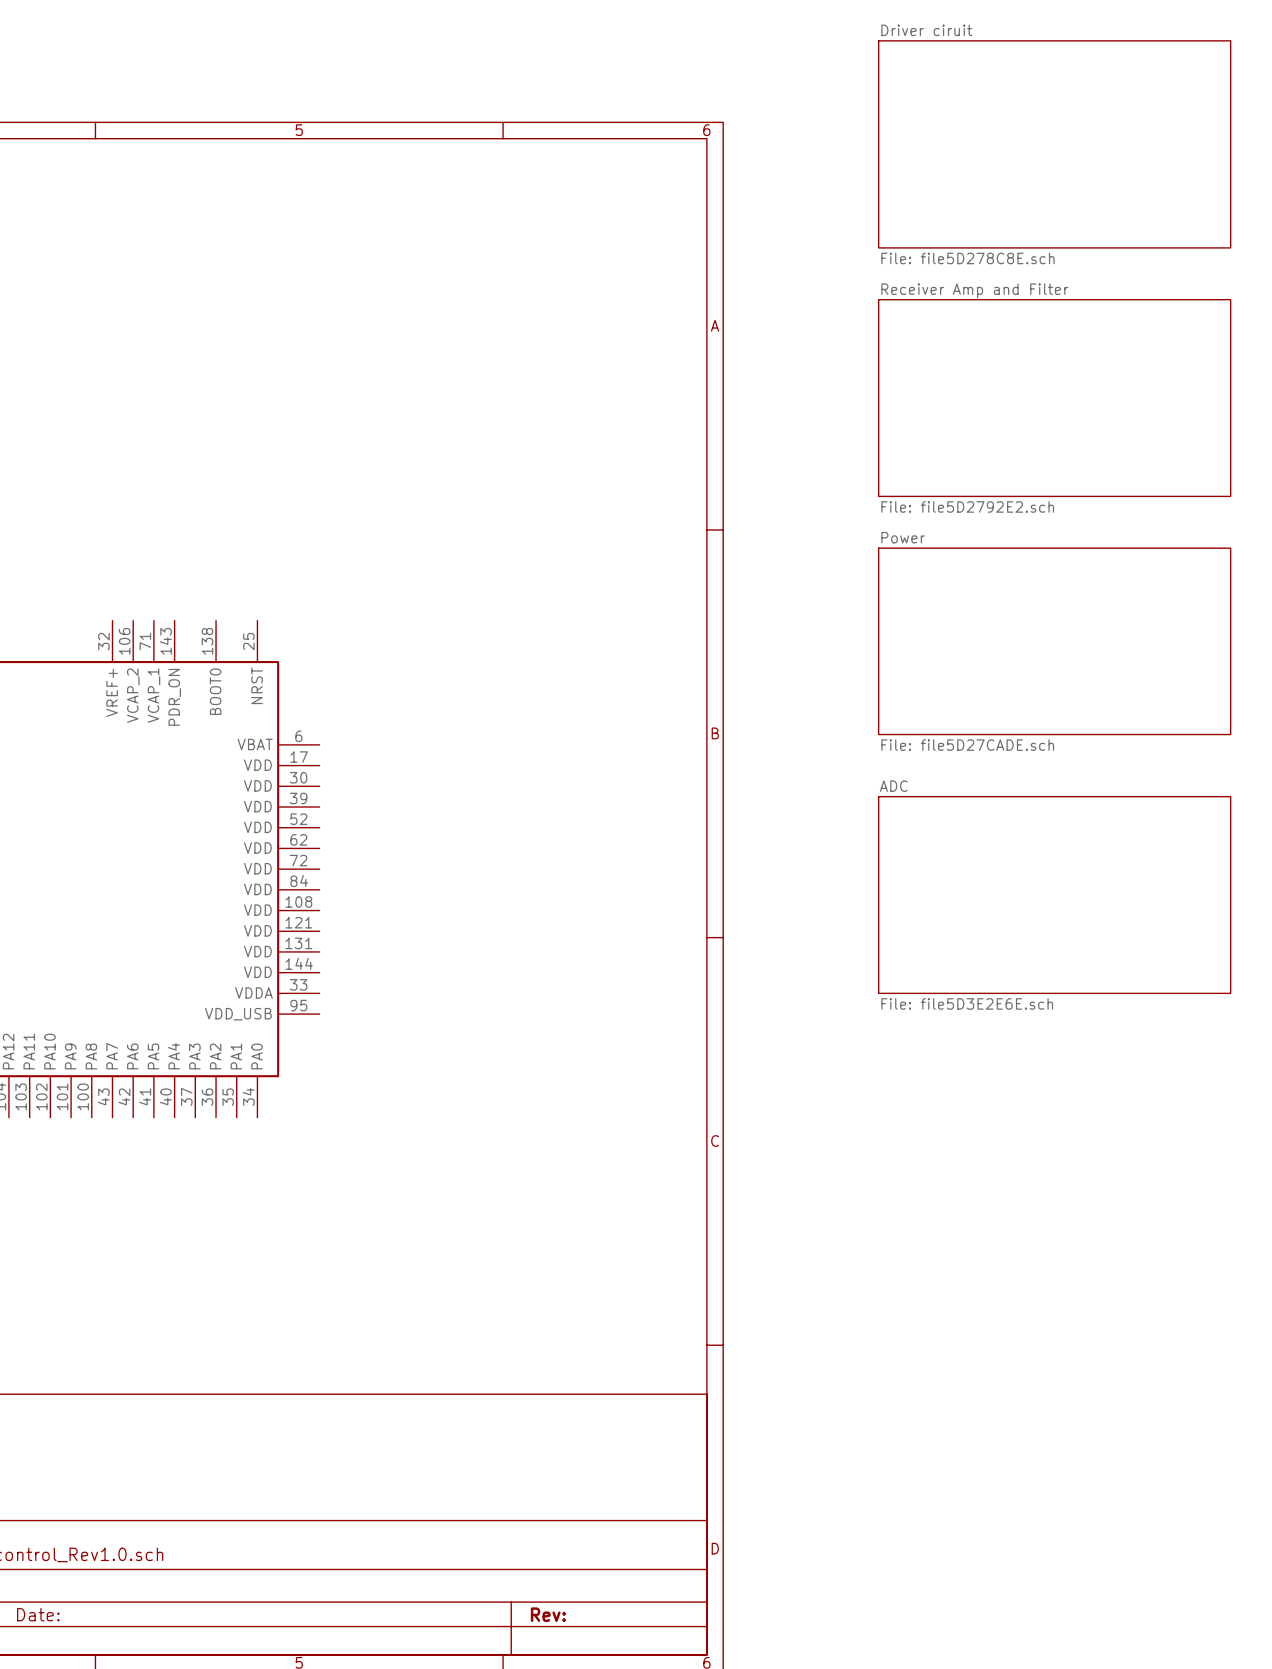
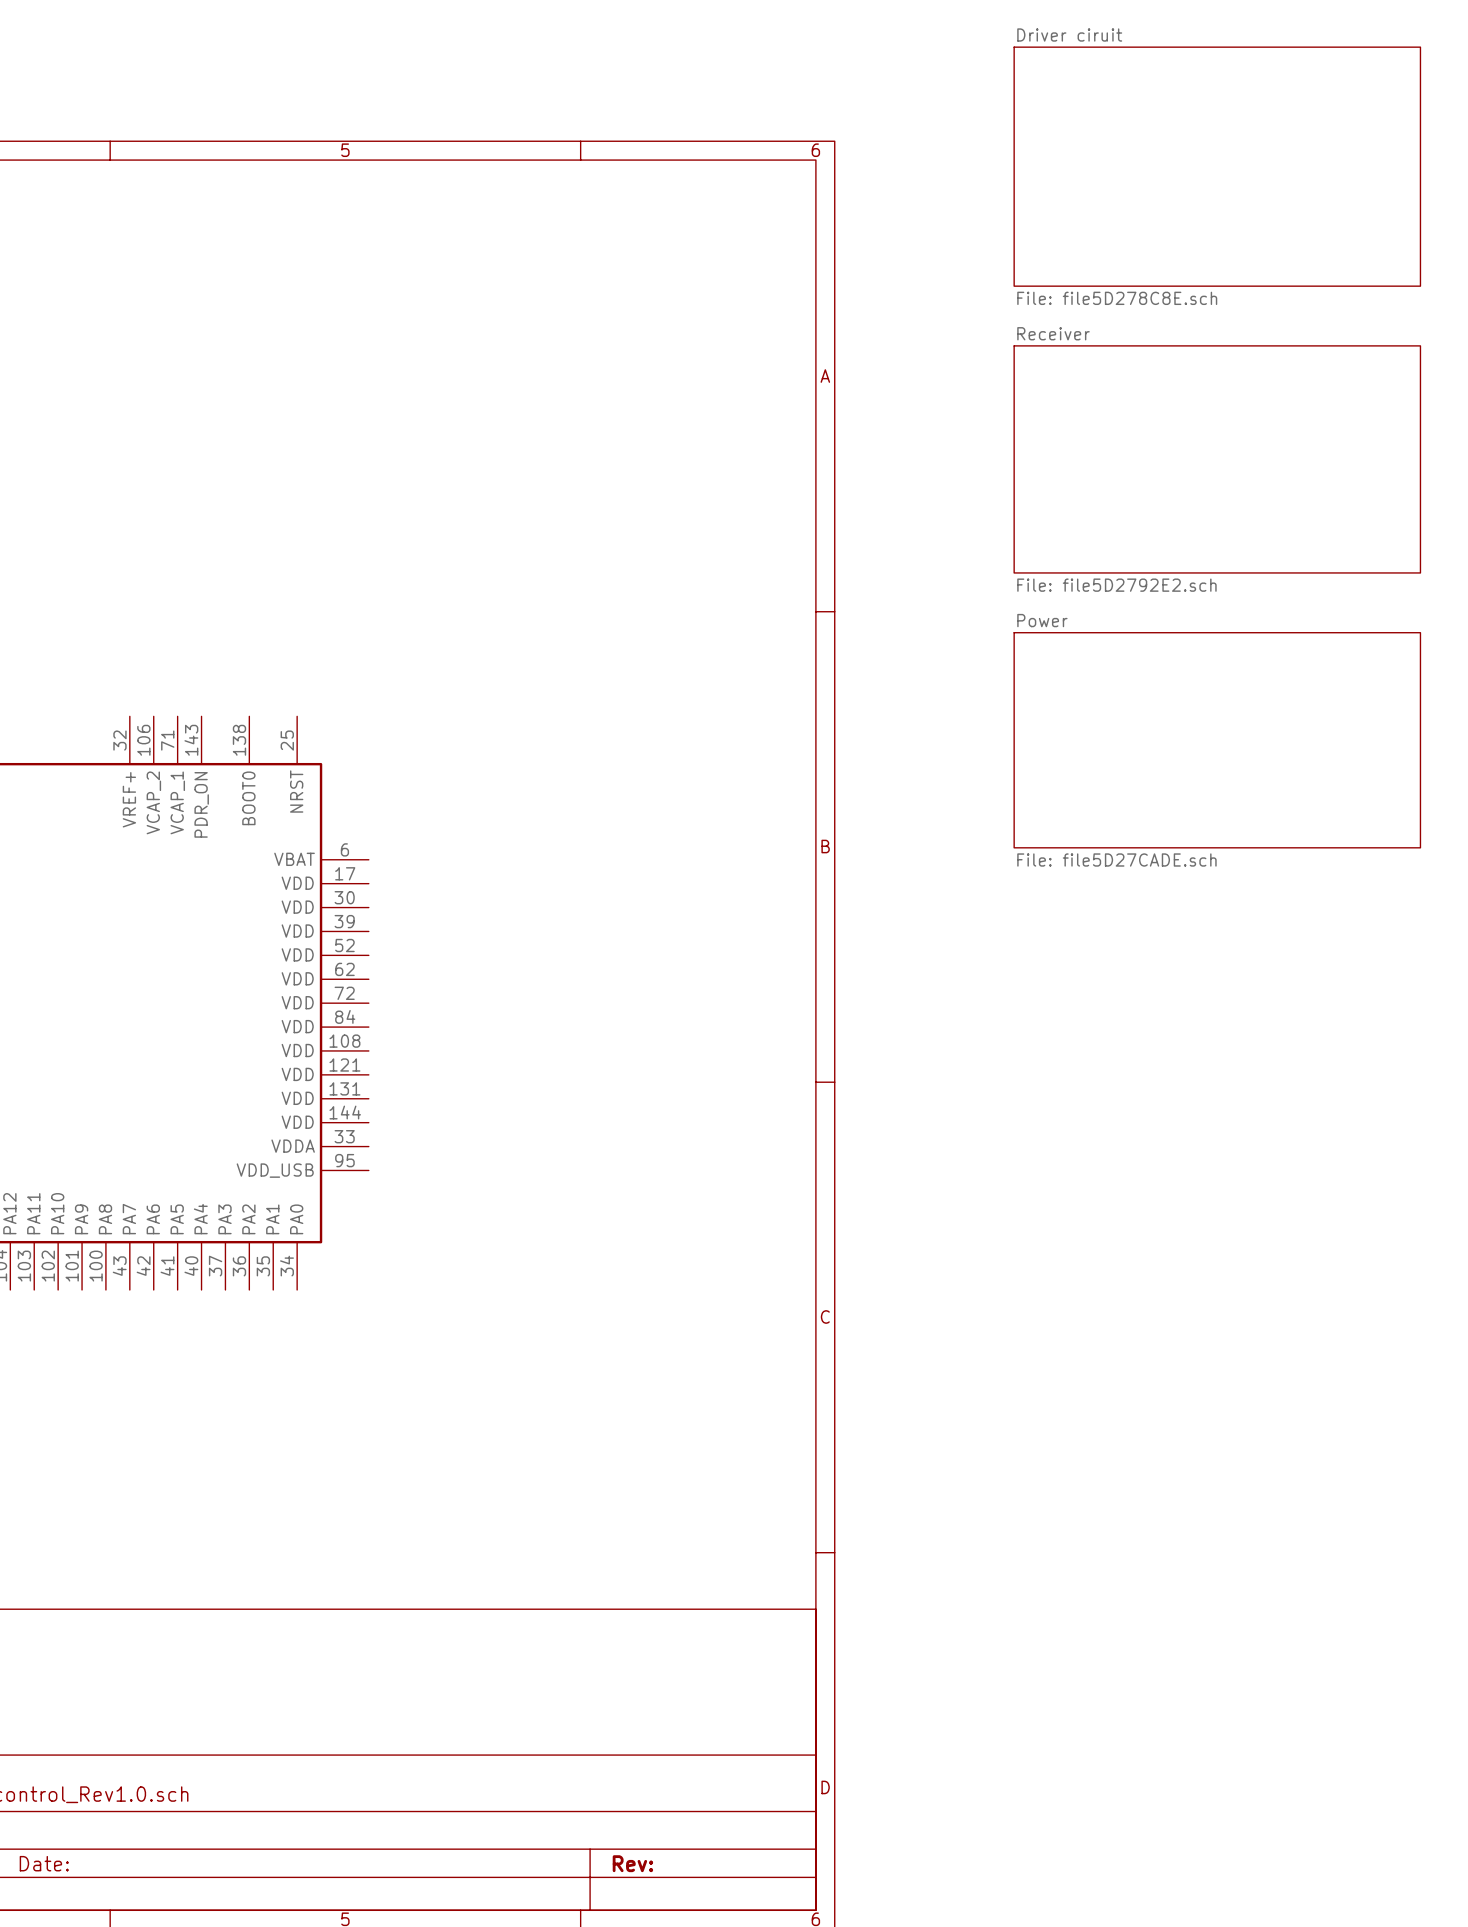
sheet Receiver Amp and Filter name: Receiver Amp and Filter (974, 290) -> Receiver (1053, 333)
sheet ADC: File: file5D3E2E6E.sch (1054, 895) -> none

